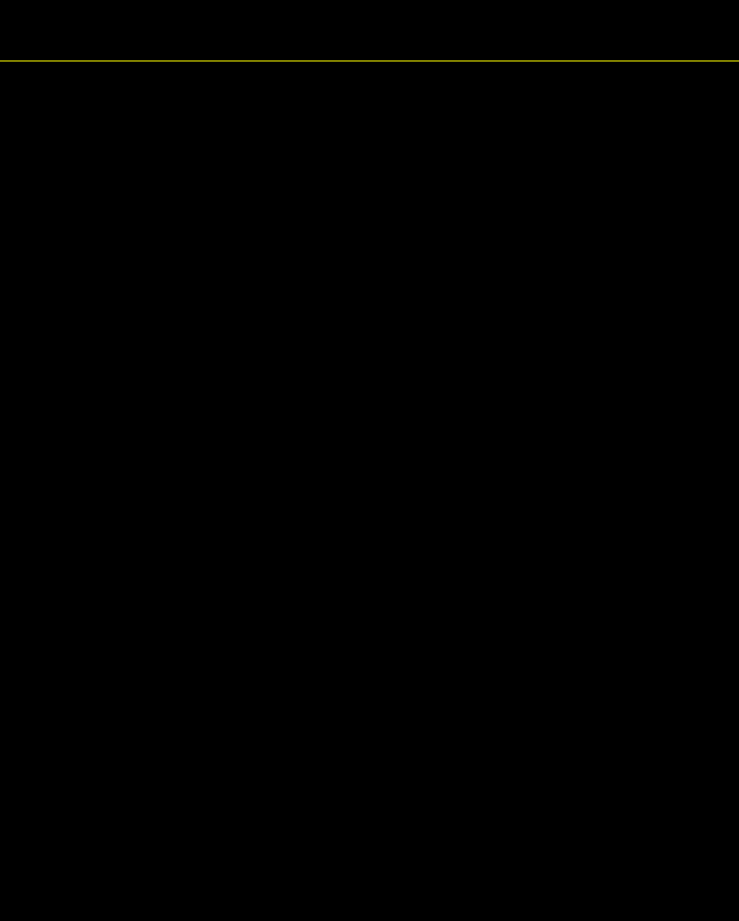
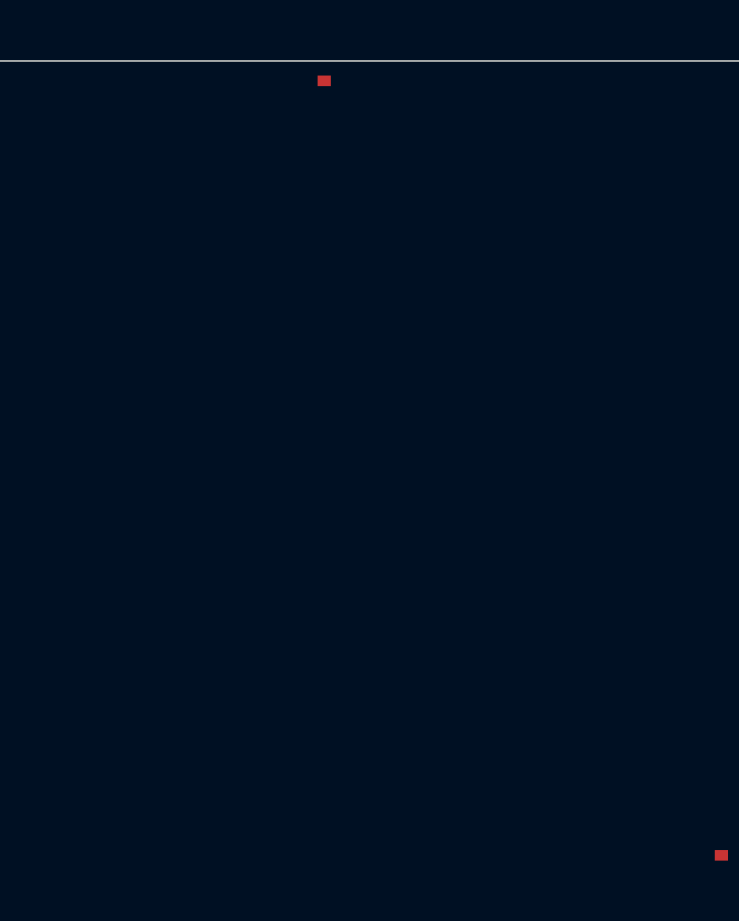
part: none -> (324, 80)
part: none -> (721, 855)

